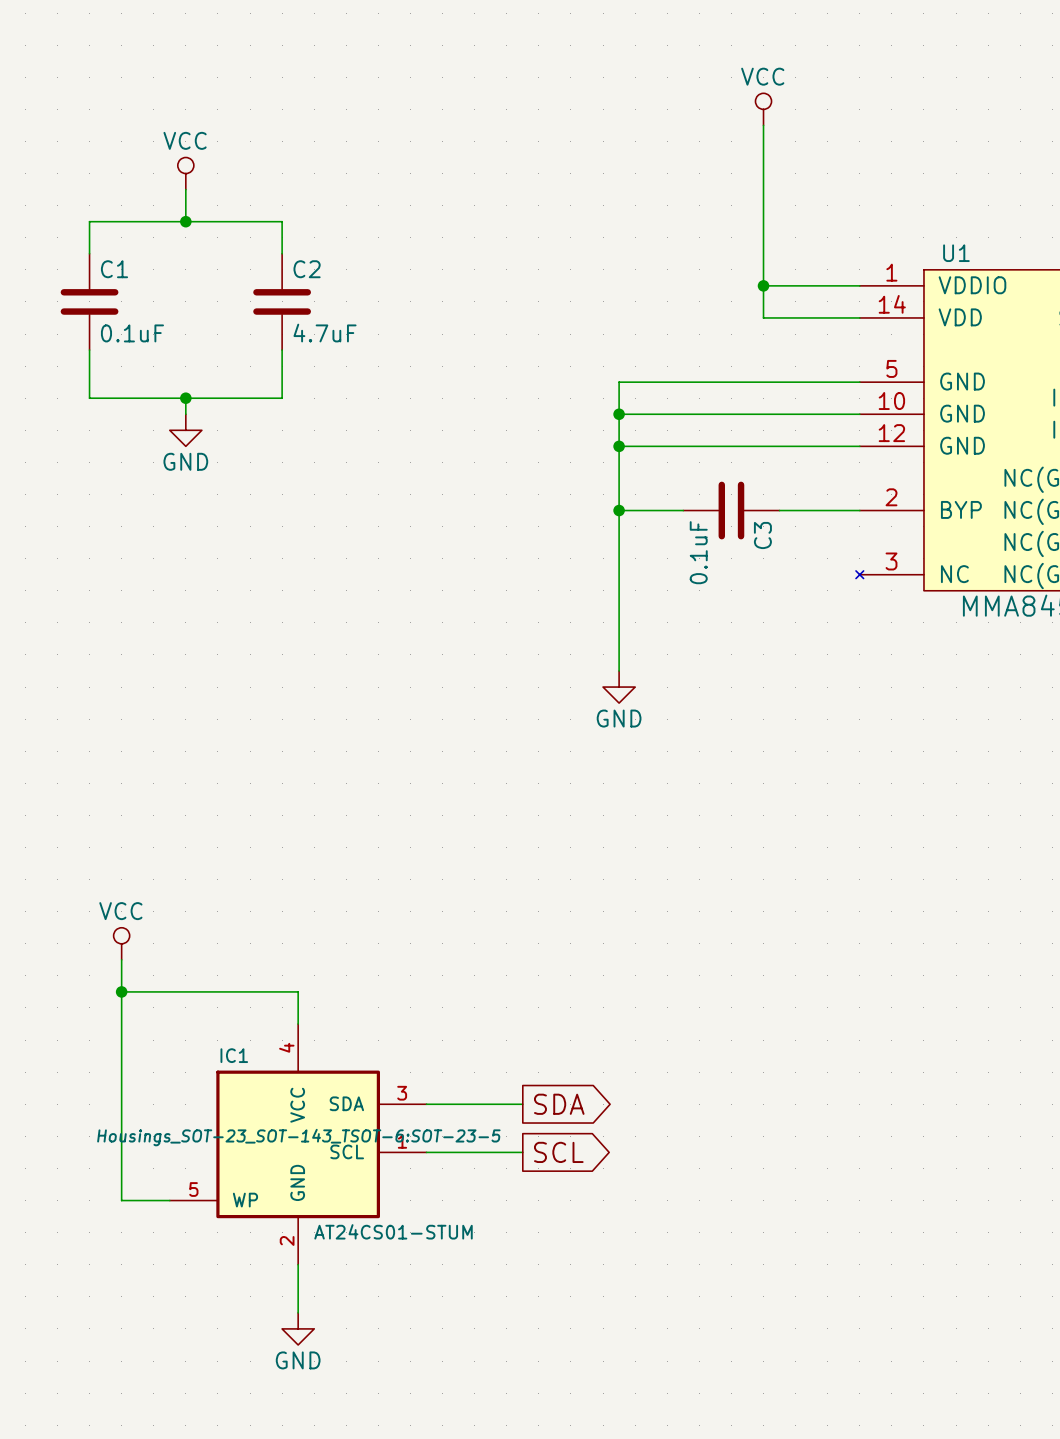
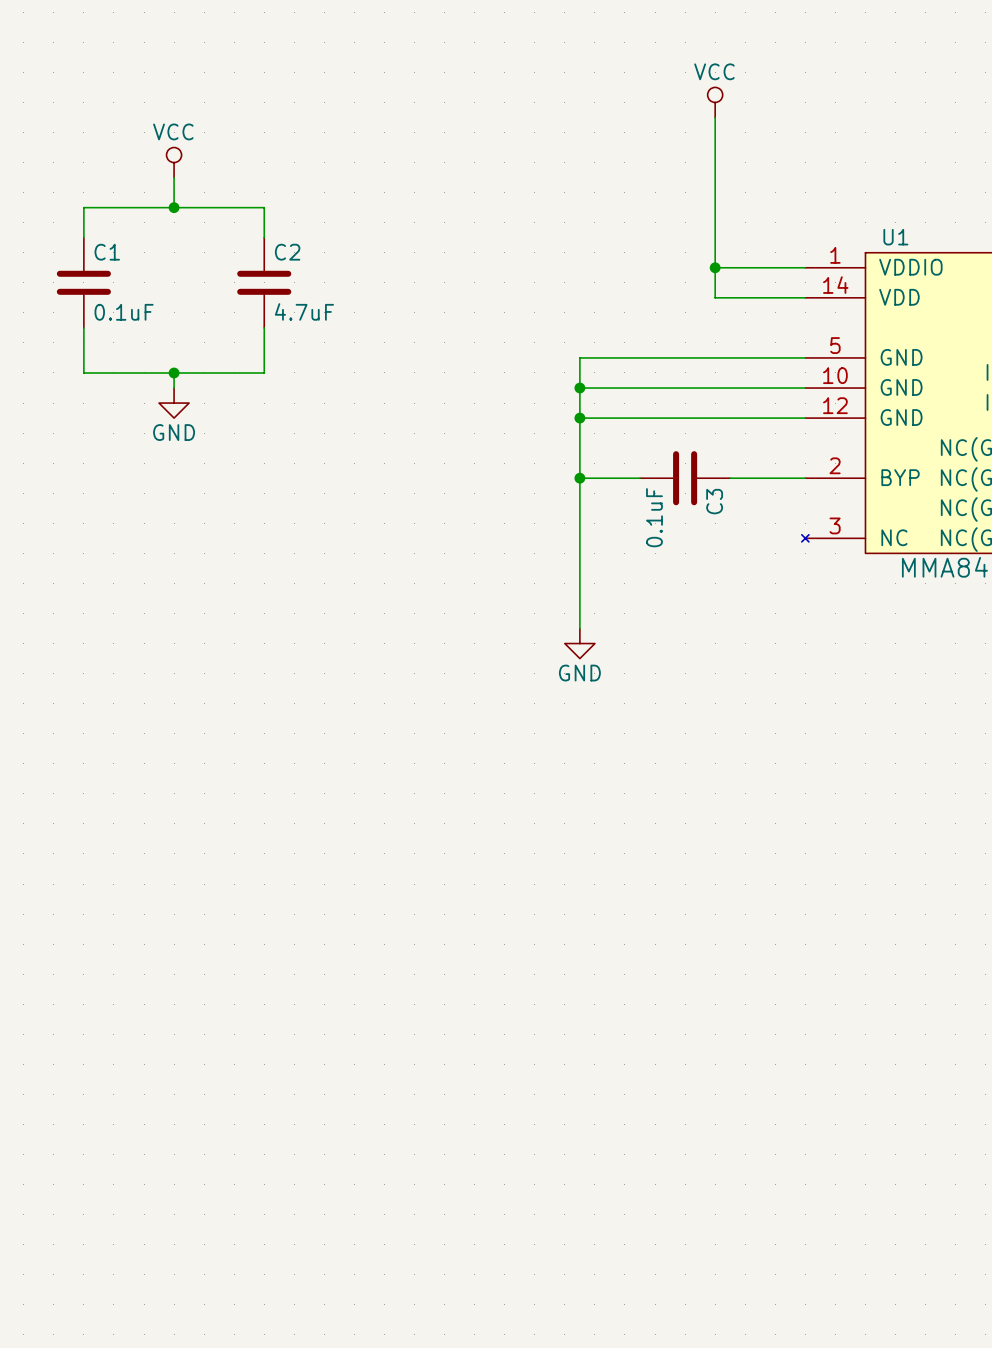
power symbol: VCC (121, 943) -> none
wire: (121, 959) (121, 1200) (169, 1200) -> none
wire: (121, 991) (298, 991) (298, 1024) -> none
junction: (121, 991) -> none
wire: (426, 1104) (522, 1104) -> none
global label: SDA (559, 1104) -> none
IC1: AT24CS01-STUM (298, 1144) -> none
wire: (426, 1152) (522, 1152) -> none
global label: SCL (558, 1152) -> none
wire: (298, 1264) (298, 1312) -> none
power symbol: GND (298, 1328) -> none

